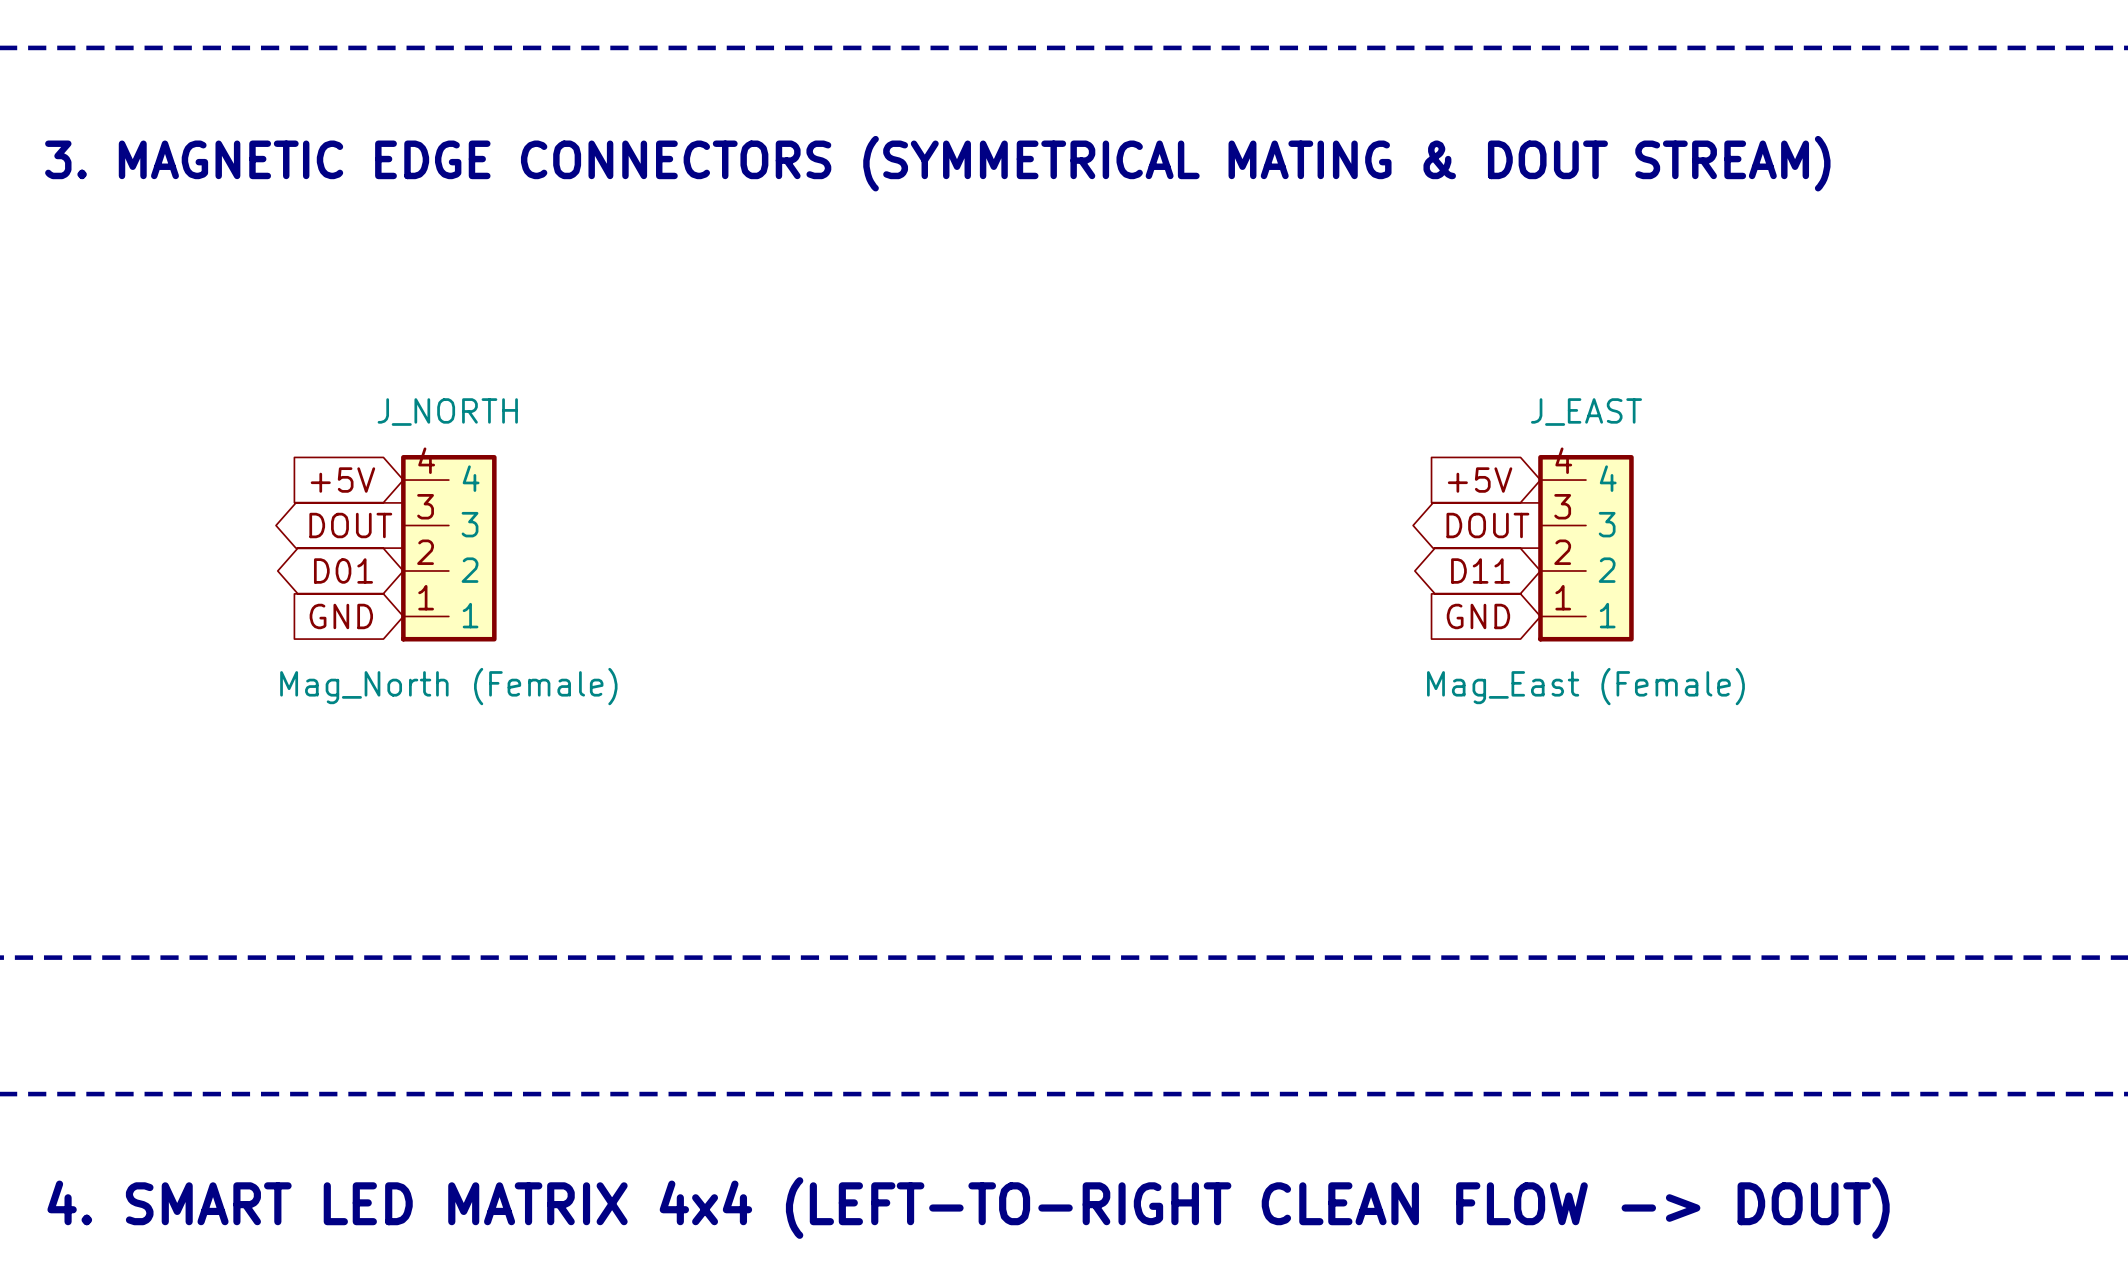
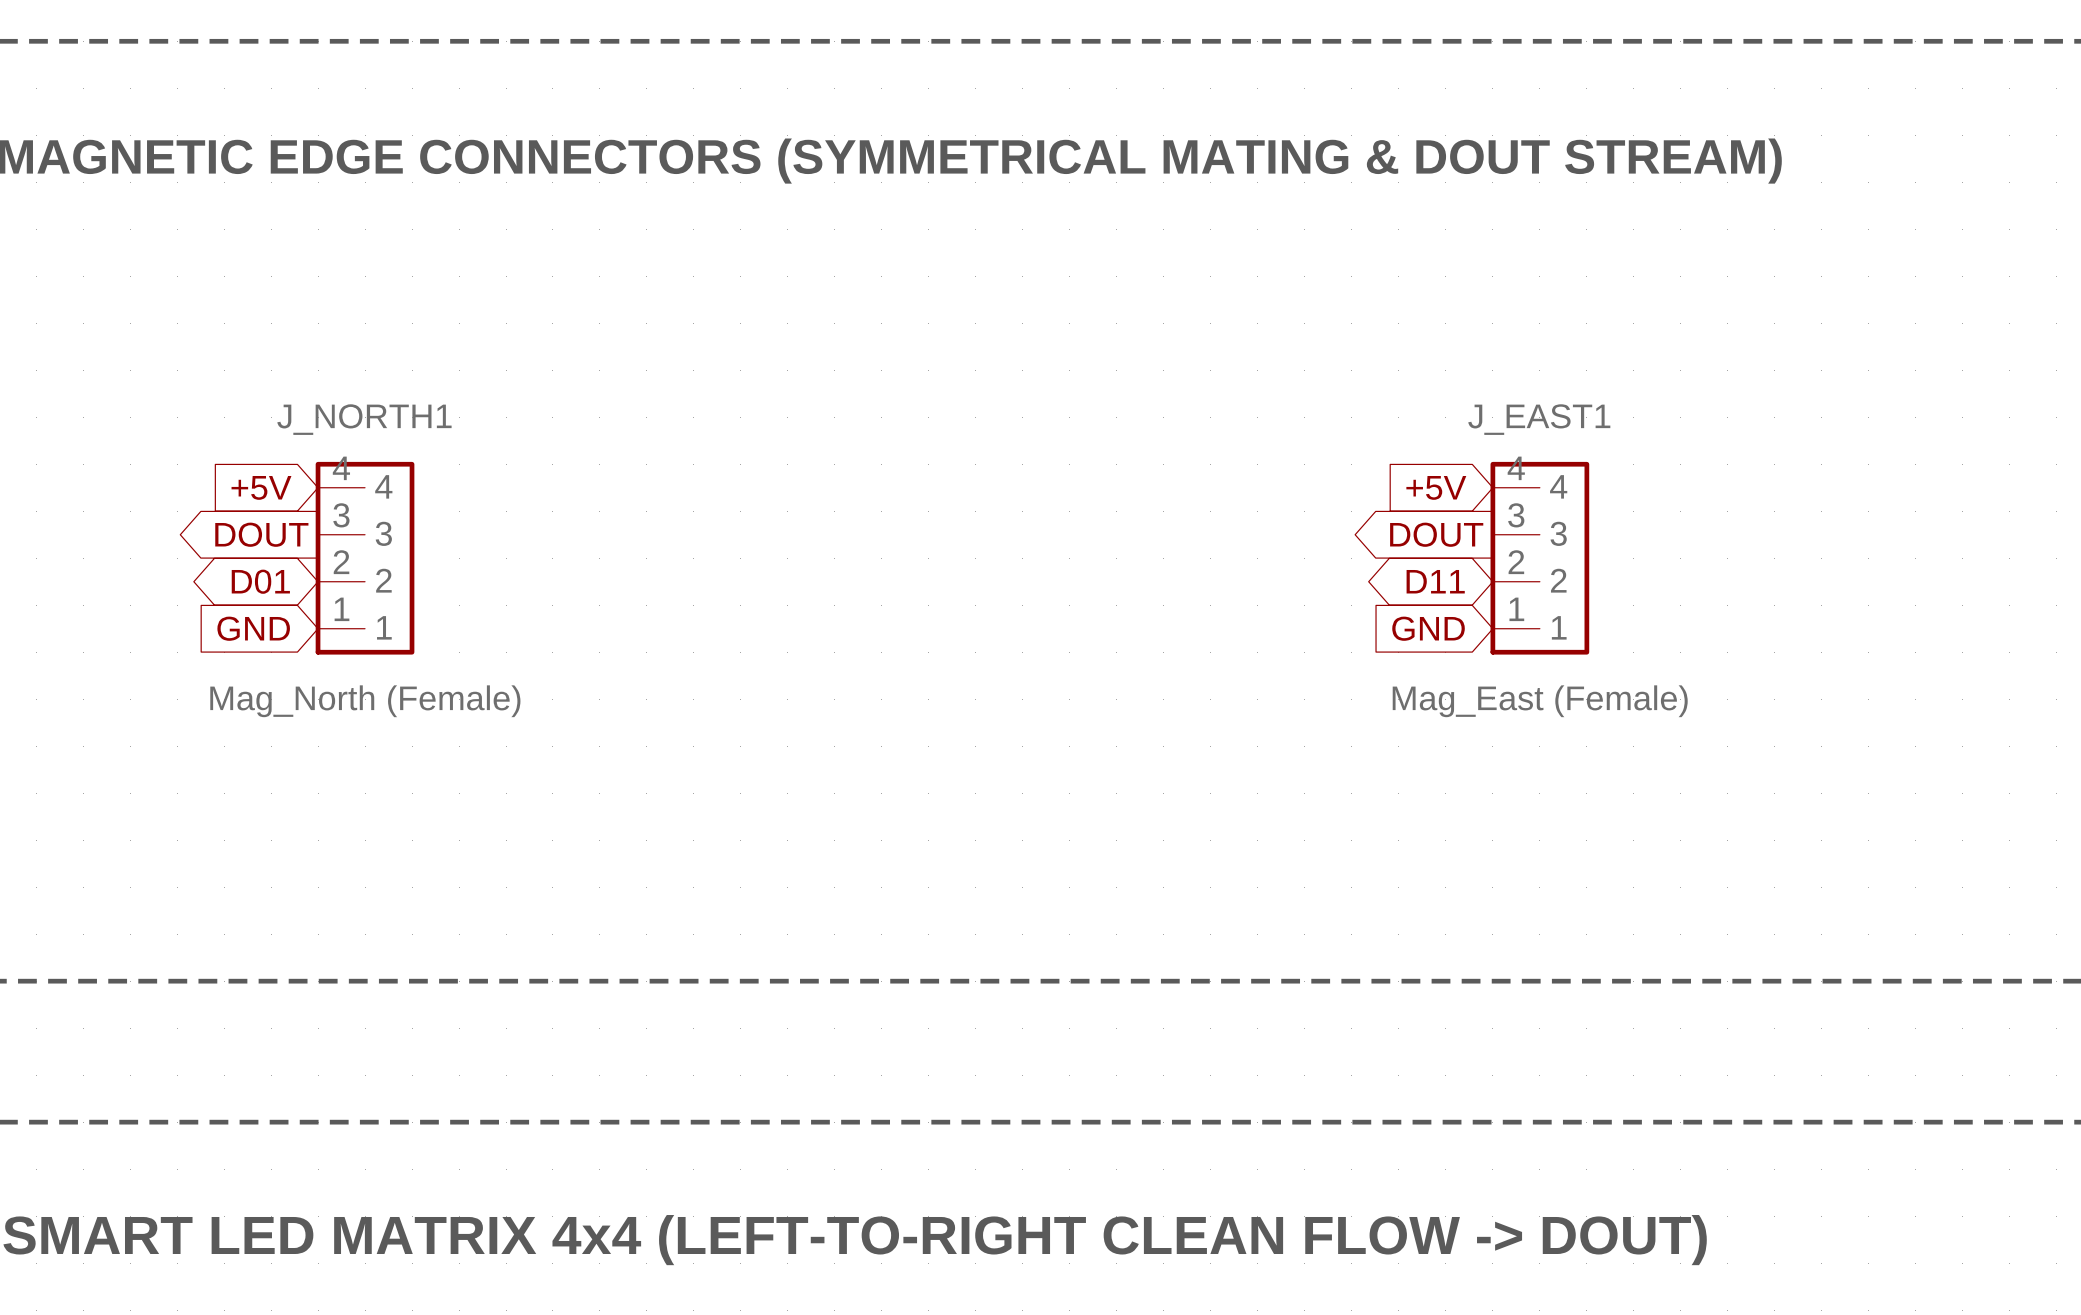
J_NORTH name: J_NORTH (447, 412) -> J_NORTH1 (364, 419)
J_EAST name: J_EAST (1586, 412) -> J_EAST1 (1539, 419)

